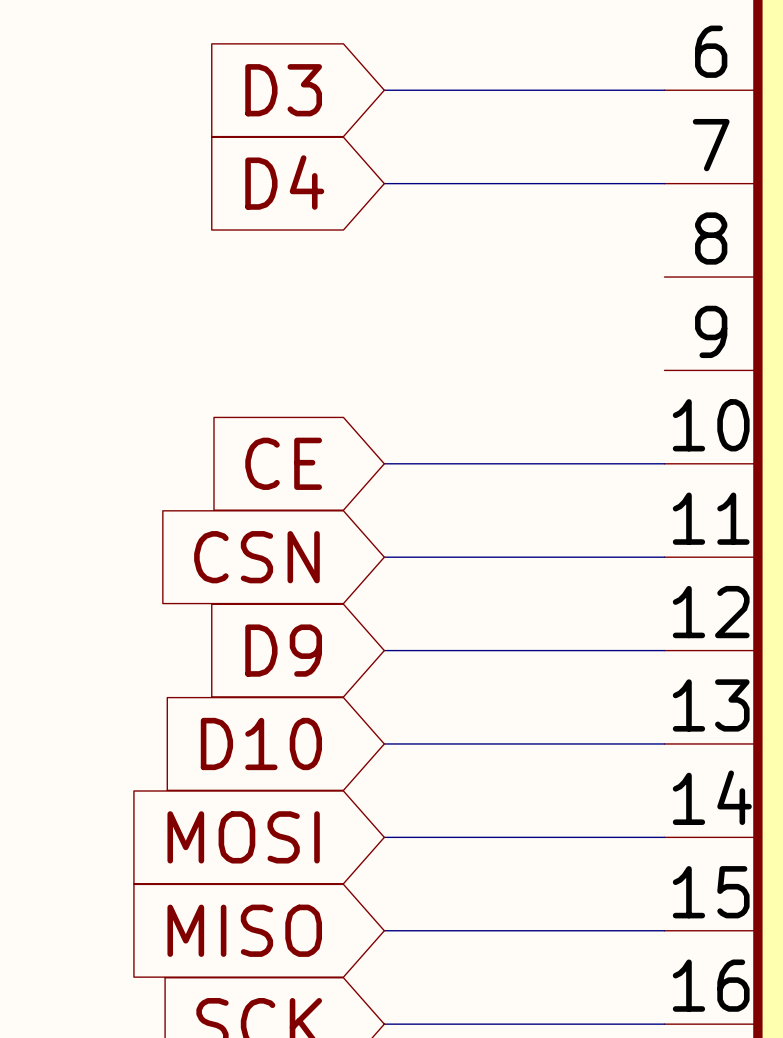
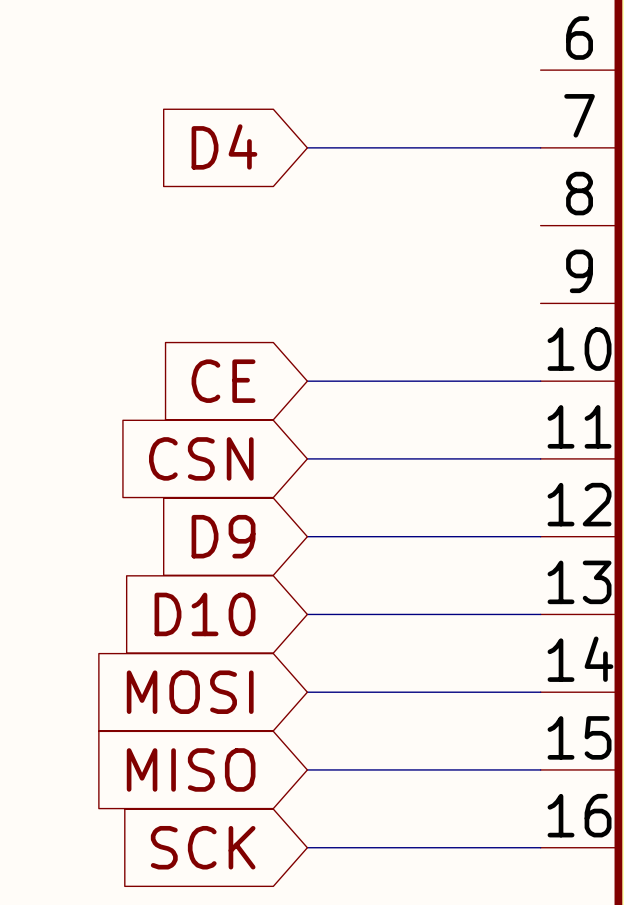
global label: D3 (283, 90) -> none
wire: (384, 90) (664, 90) -> none

